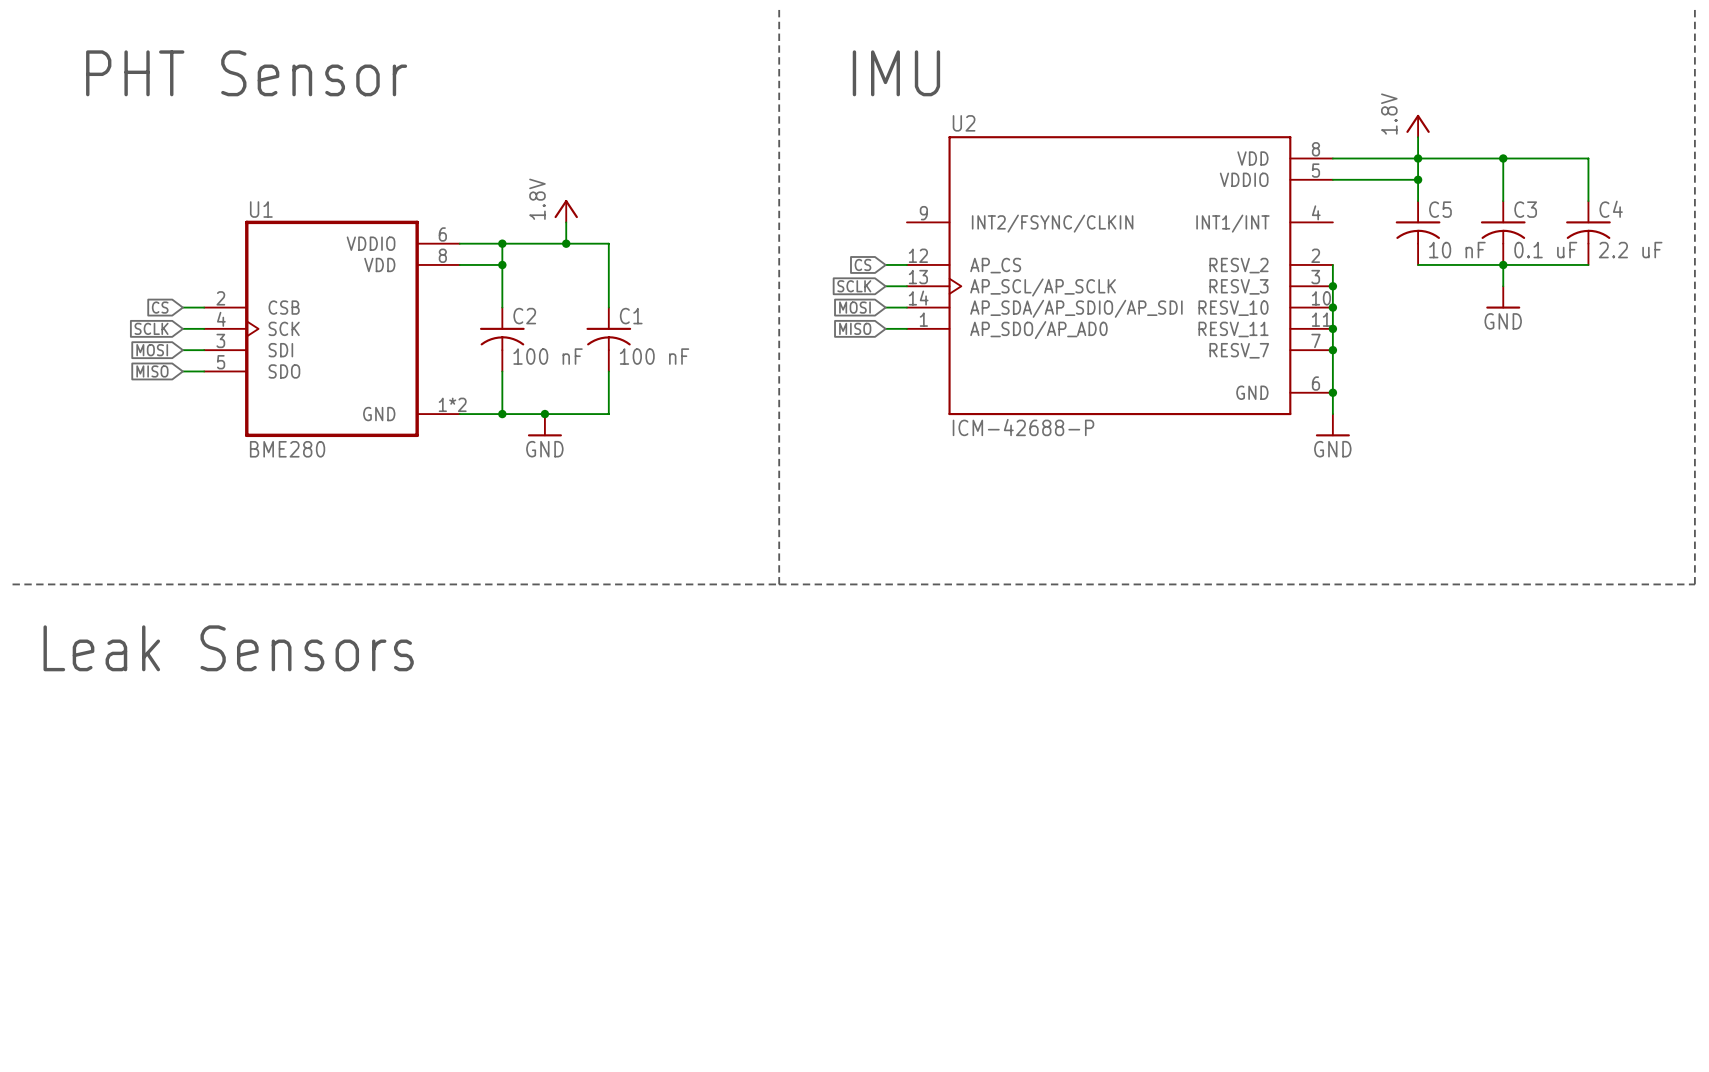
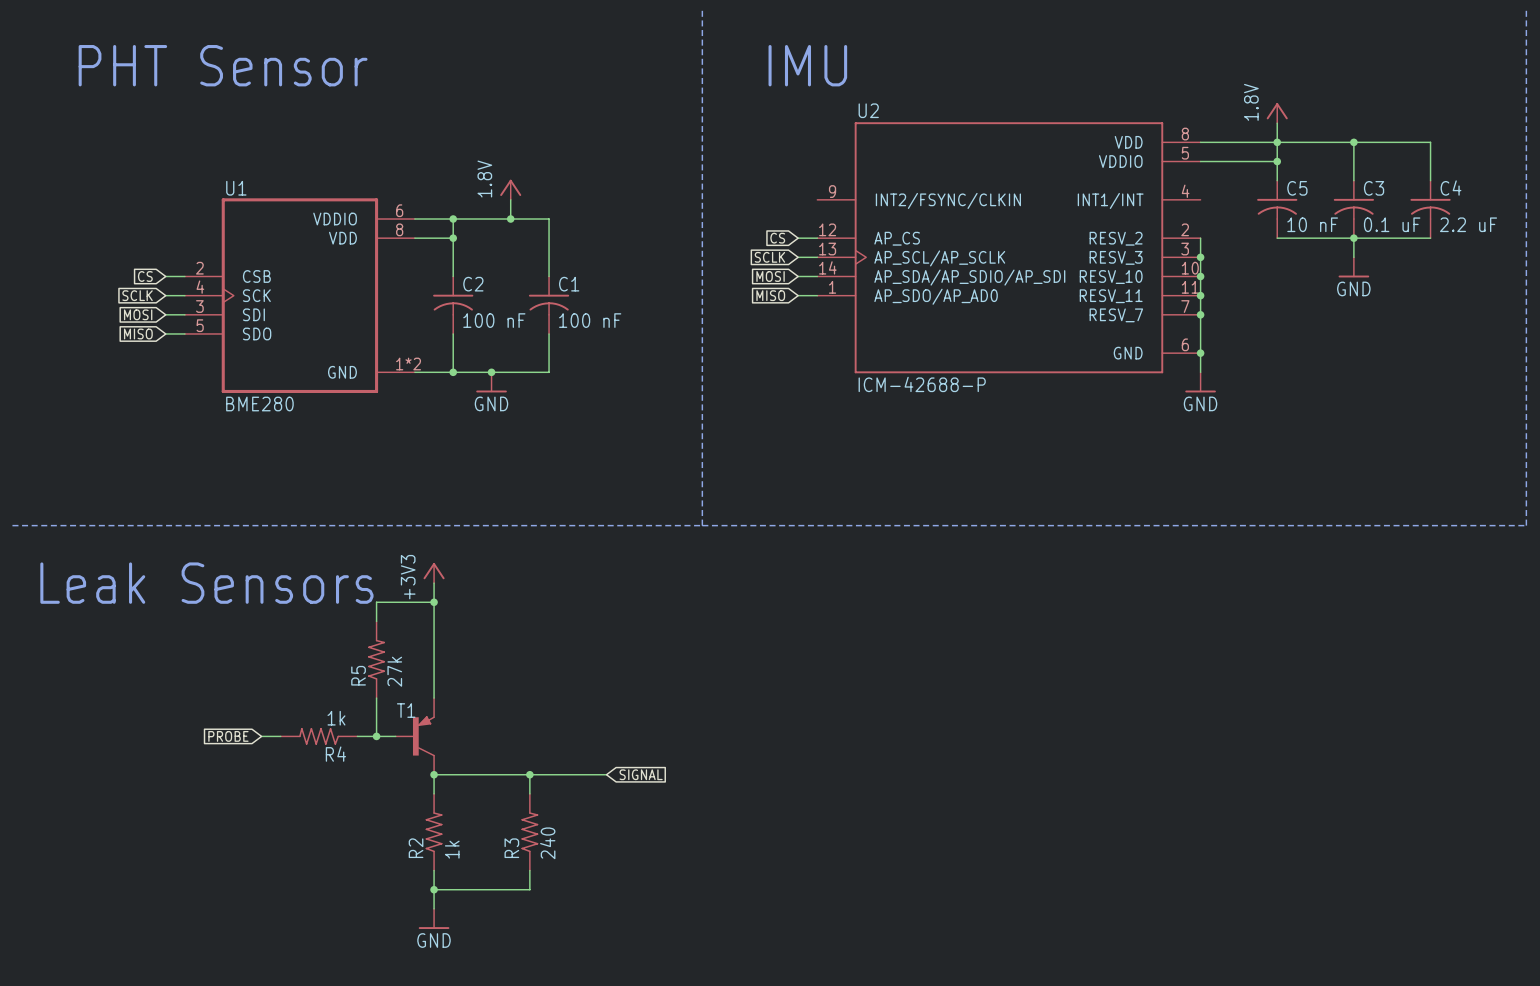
power symbol: none -> +3V3 (434, 573)
wire: none -> (434, 583) (434, 698)
wire: none -> (434, 602) (376, 602) (376, 621)
junction: none -> (434, 602)
R5: none -> 27k (376, 659)
wire: none -> (376, 698) (376, 736)
global label: none -> PROBE (228, 736)
wire: none -> (261, 736) (280, 736)
R4: none -> 1k (319, 736)
wire: none -> (357, 736) (395, 736)
junction: none -> (376, 736)
T1: none -> (415, 736)
junction: none -> (434, 774)
wire: none -> (529, 774) (529, 793)
junction: none -> (529, 774)
wire: none -> (606, 774) (434, 774) (434, 793)
global label: none -> SIGNAL (641, 774)
R2: none -> 1k (434, 832)
R3: none -> 240 (529, 832)
wire: none -> (434, 870) (434, 908)
wire: none -> (529, 870) (529, 889) (434, 889)
junction: none -> (434, 889)
power symbol: none -> GND (434, 918)

